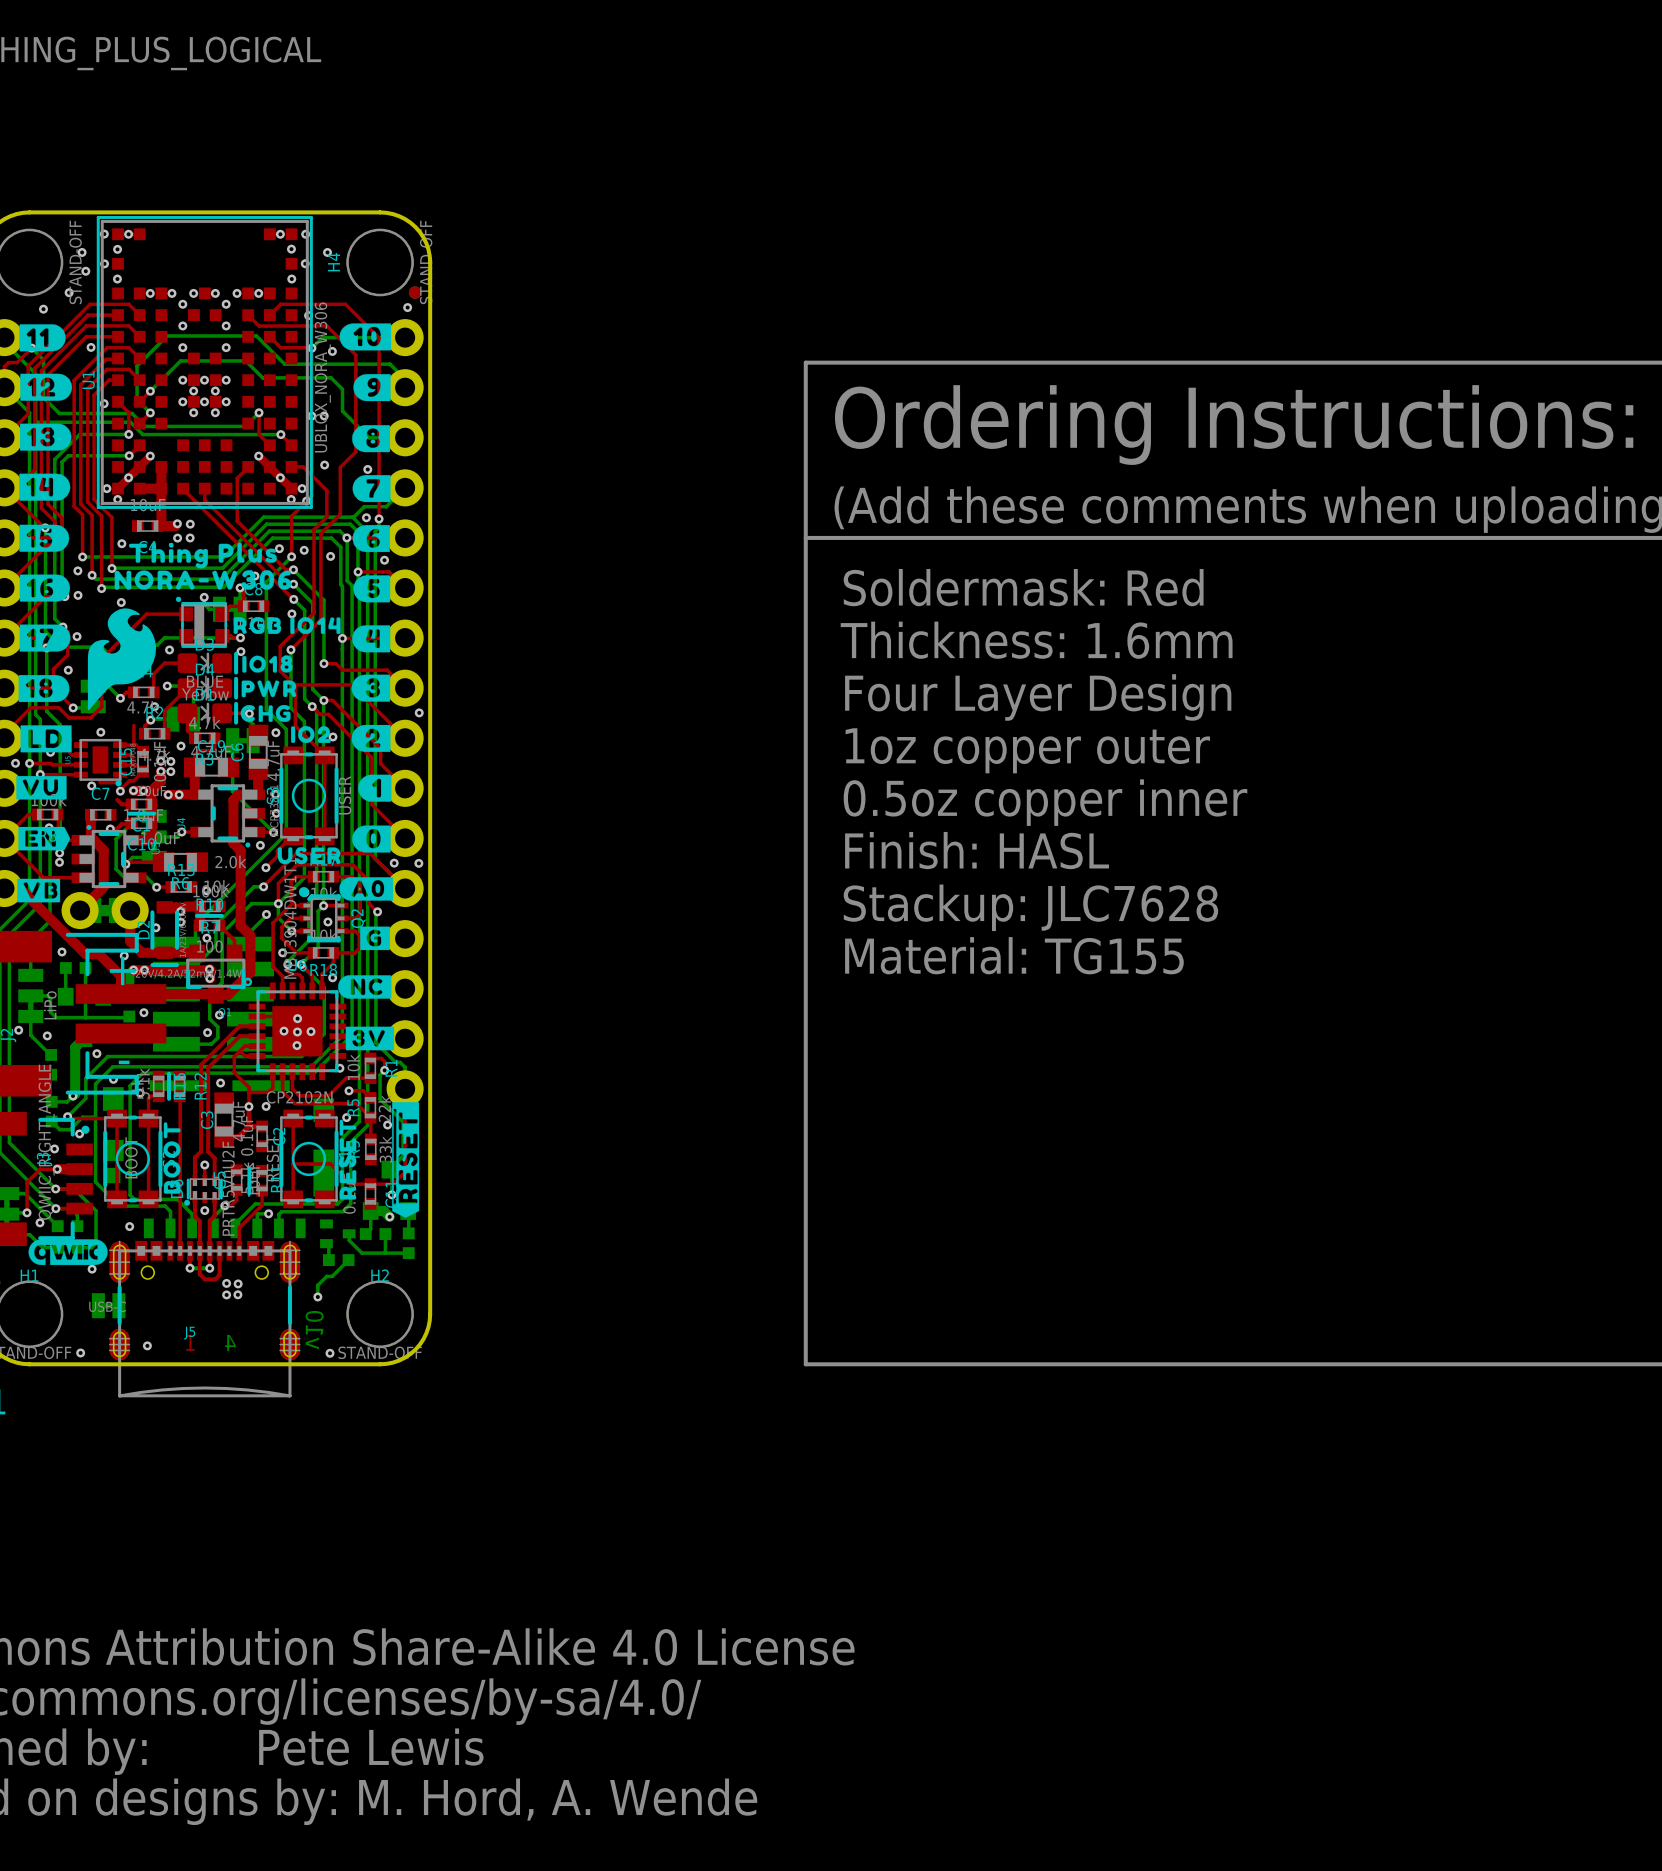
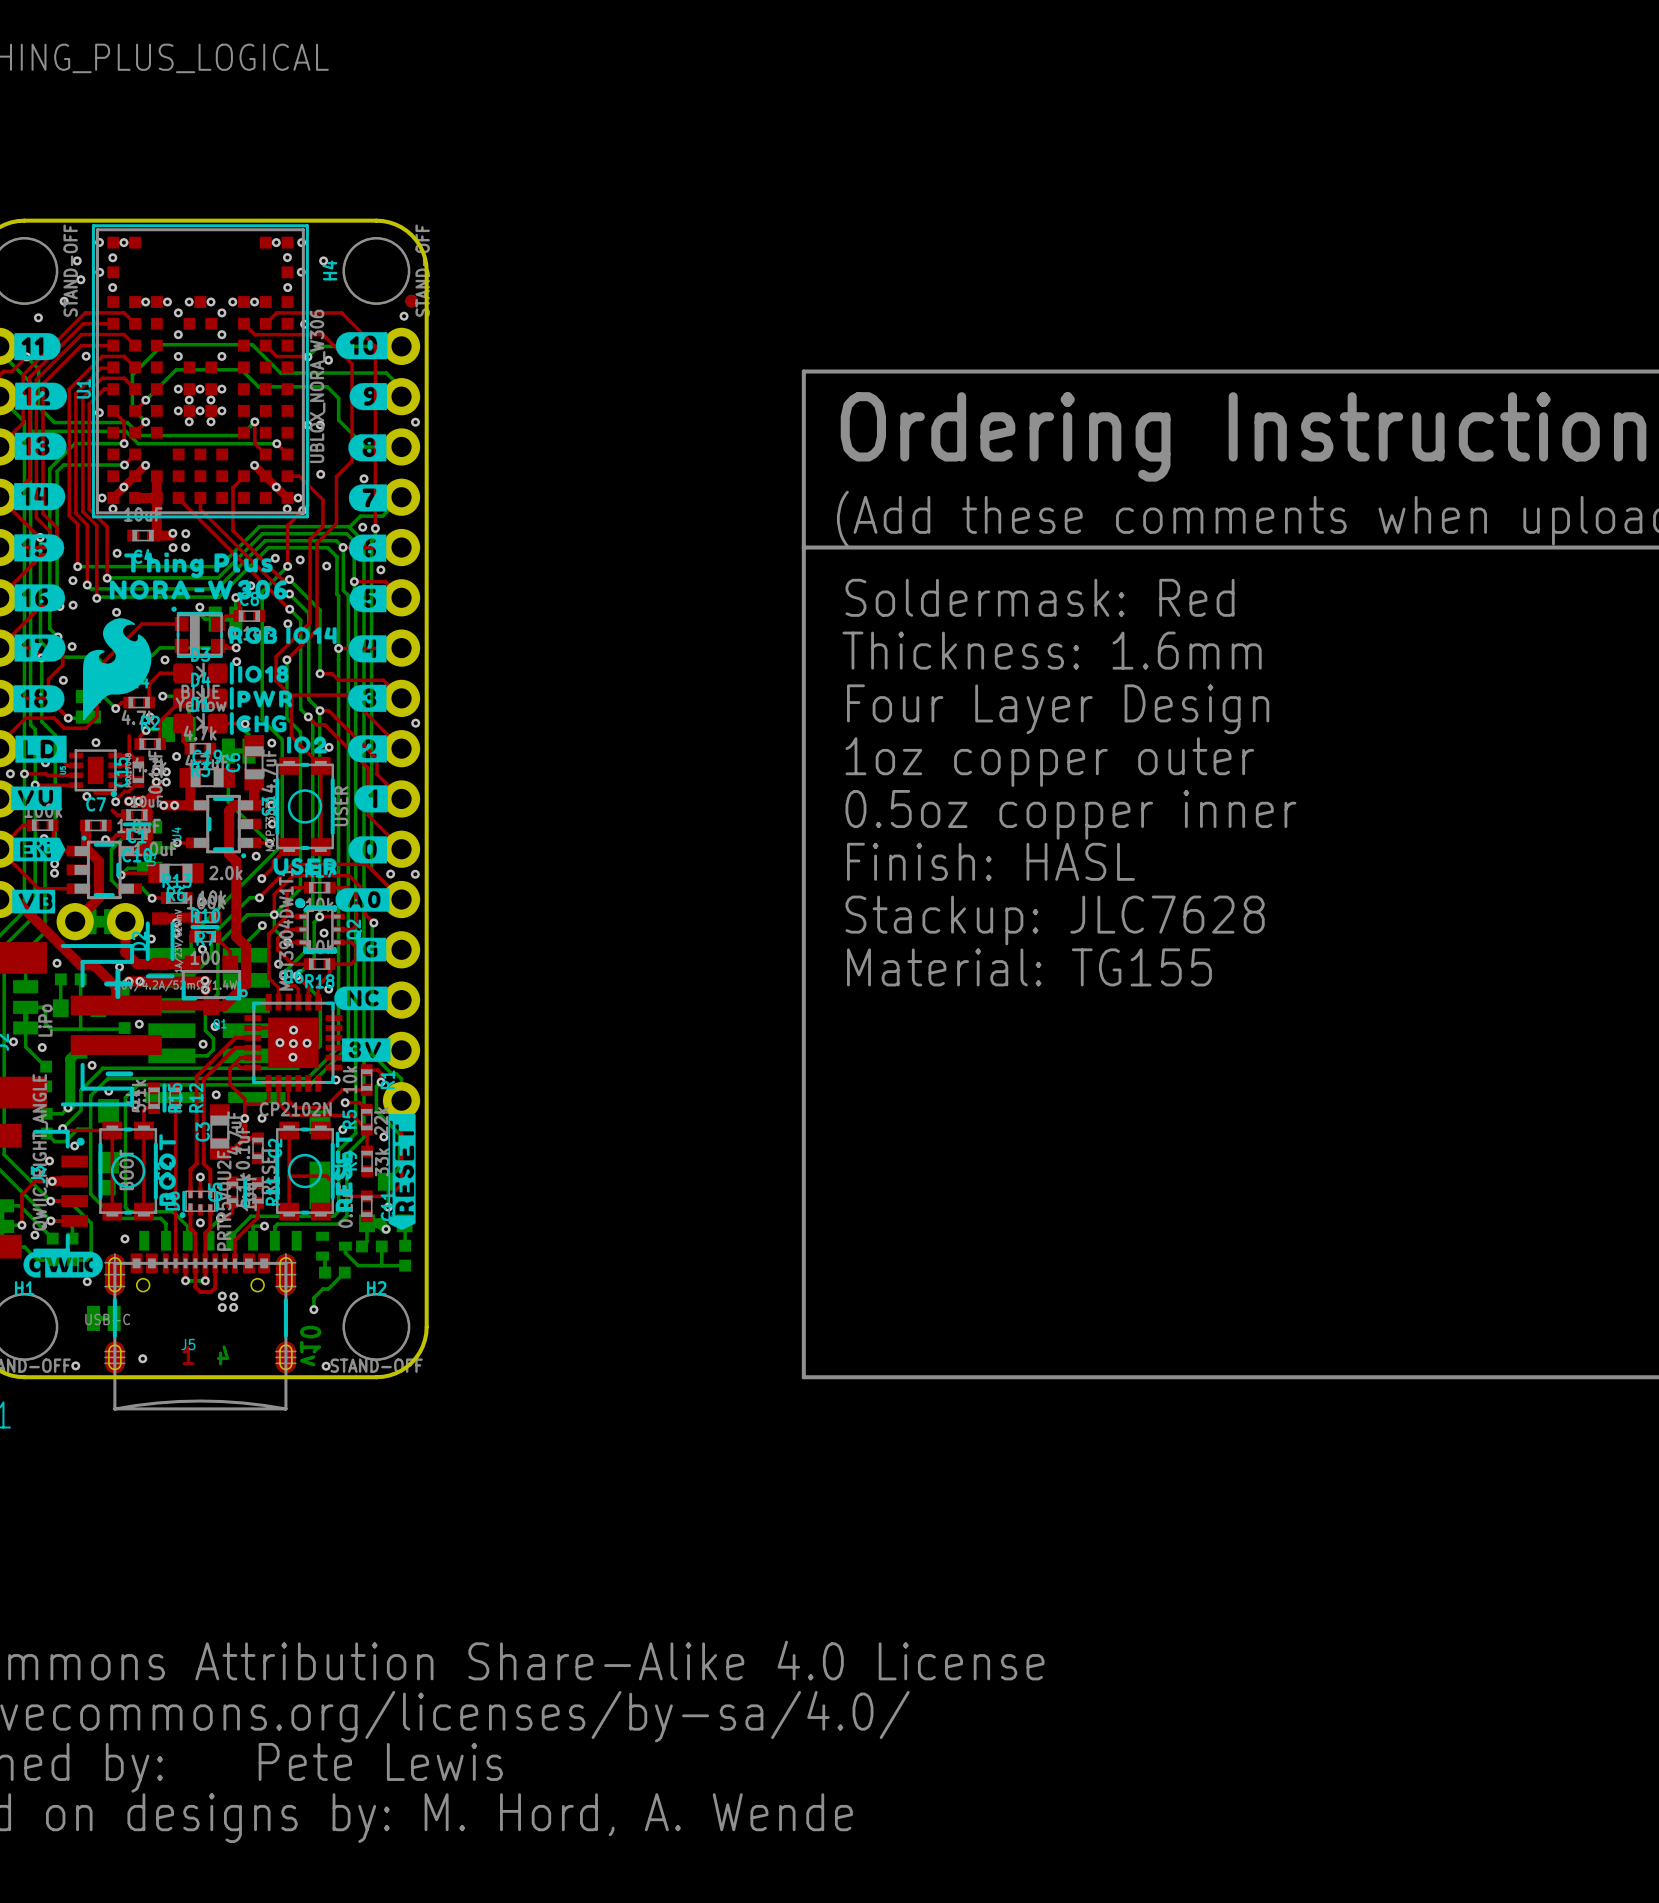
via: none -> (415, 422)

